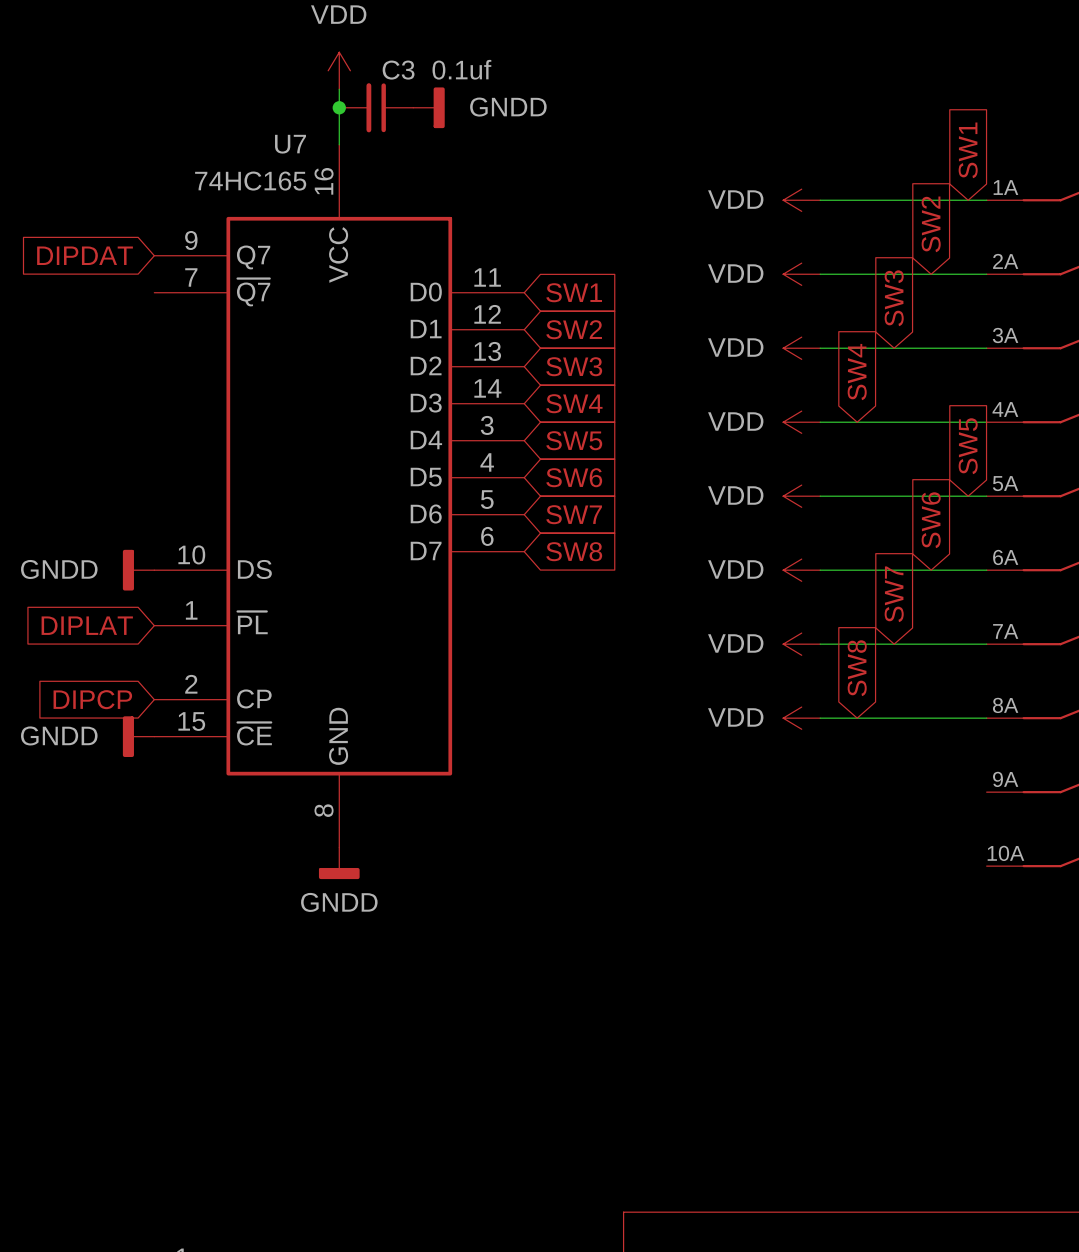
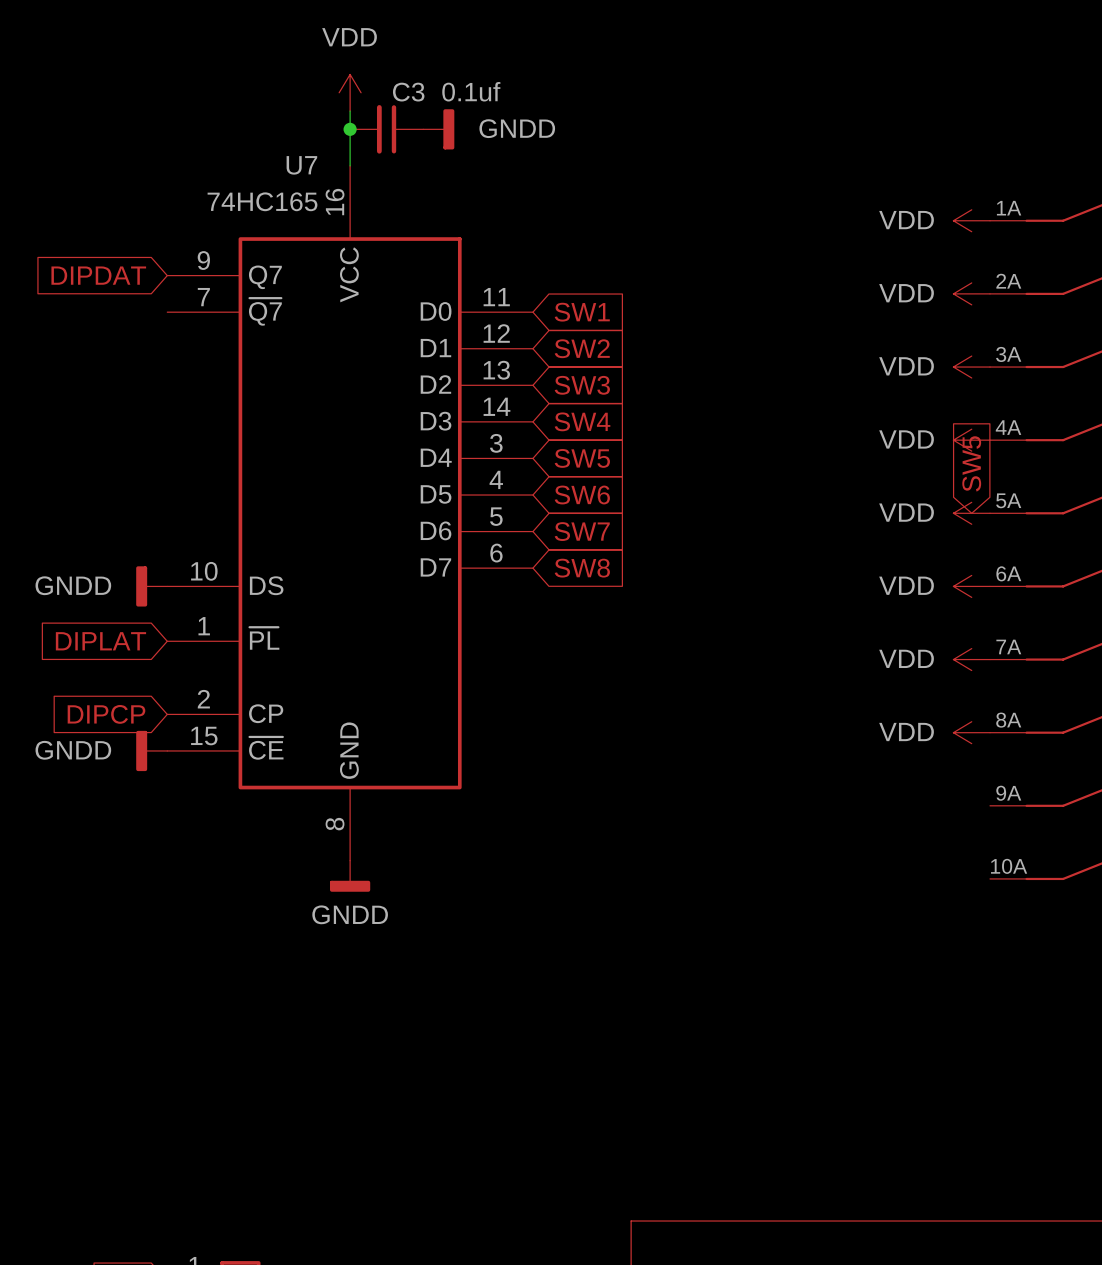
global label: SW1 (968, 150) -> none
power symbol: VDD (801, 200) -> none
wire: (820, 200) (986, 200) -> none
power symbol: none -> VDD (971, 220)
global label: SW2 (931, 224) -> none
power symbol: VDD (801, 274) -> none
wire: (820, 274) (986, 274) -> none
power symbol: none -> VDD (971, 293)
global label: SW3 (894, 298) -> none
power symbol: VDD (801, 348) -> none
wire: (820, 348) (986, 348) -> none
power symbol: none -> VDD (971, 367)
global label: SW4 (857, 372) -> none
power symbol: VDD (801, 422) -> none
wire: (820, 422) (986, 422) -> none
power symbol: none -> VDD (971, 440)
power symbol: VDD (801, 496) -> none
wire: (820, 496) (986, 496) -> none
power symbol: none -> VDD (971, 513)
global label: SW6 (931, 520) -> none
power symbol: VDD (801, 570) -> none
wire: (820, 570) (986, 570) -> none
power symbol: none -> VDD (971, 586)
global label: SW7 (894, 594) -> none
power symbol: VDD (801, 644) -> none
wire: (820, 644) (986, 644) -> none
power symbol: none -> VDD (971, 659)
global label: SW8 (857, 668) -> none
power symbol: VDD (801, 718) -> none
wire: (820, 718) (986, 718) -> none
power symbol: none -> VDD (971, 732)

